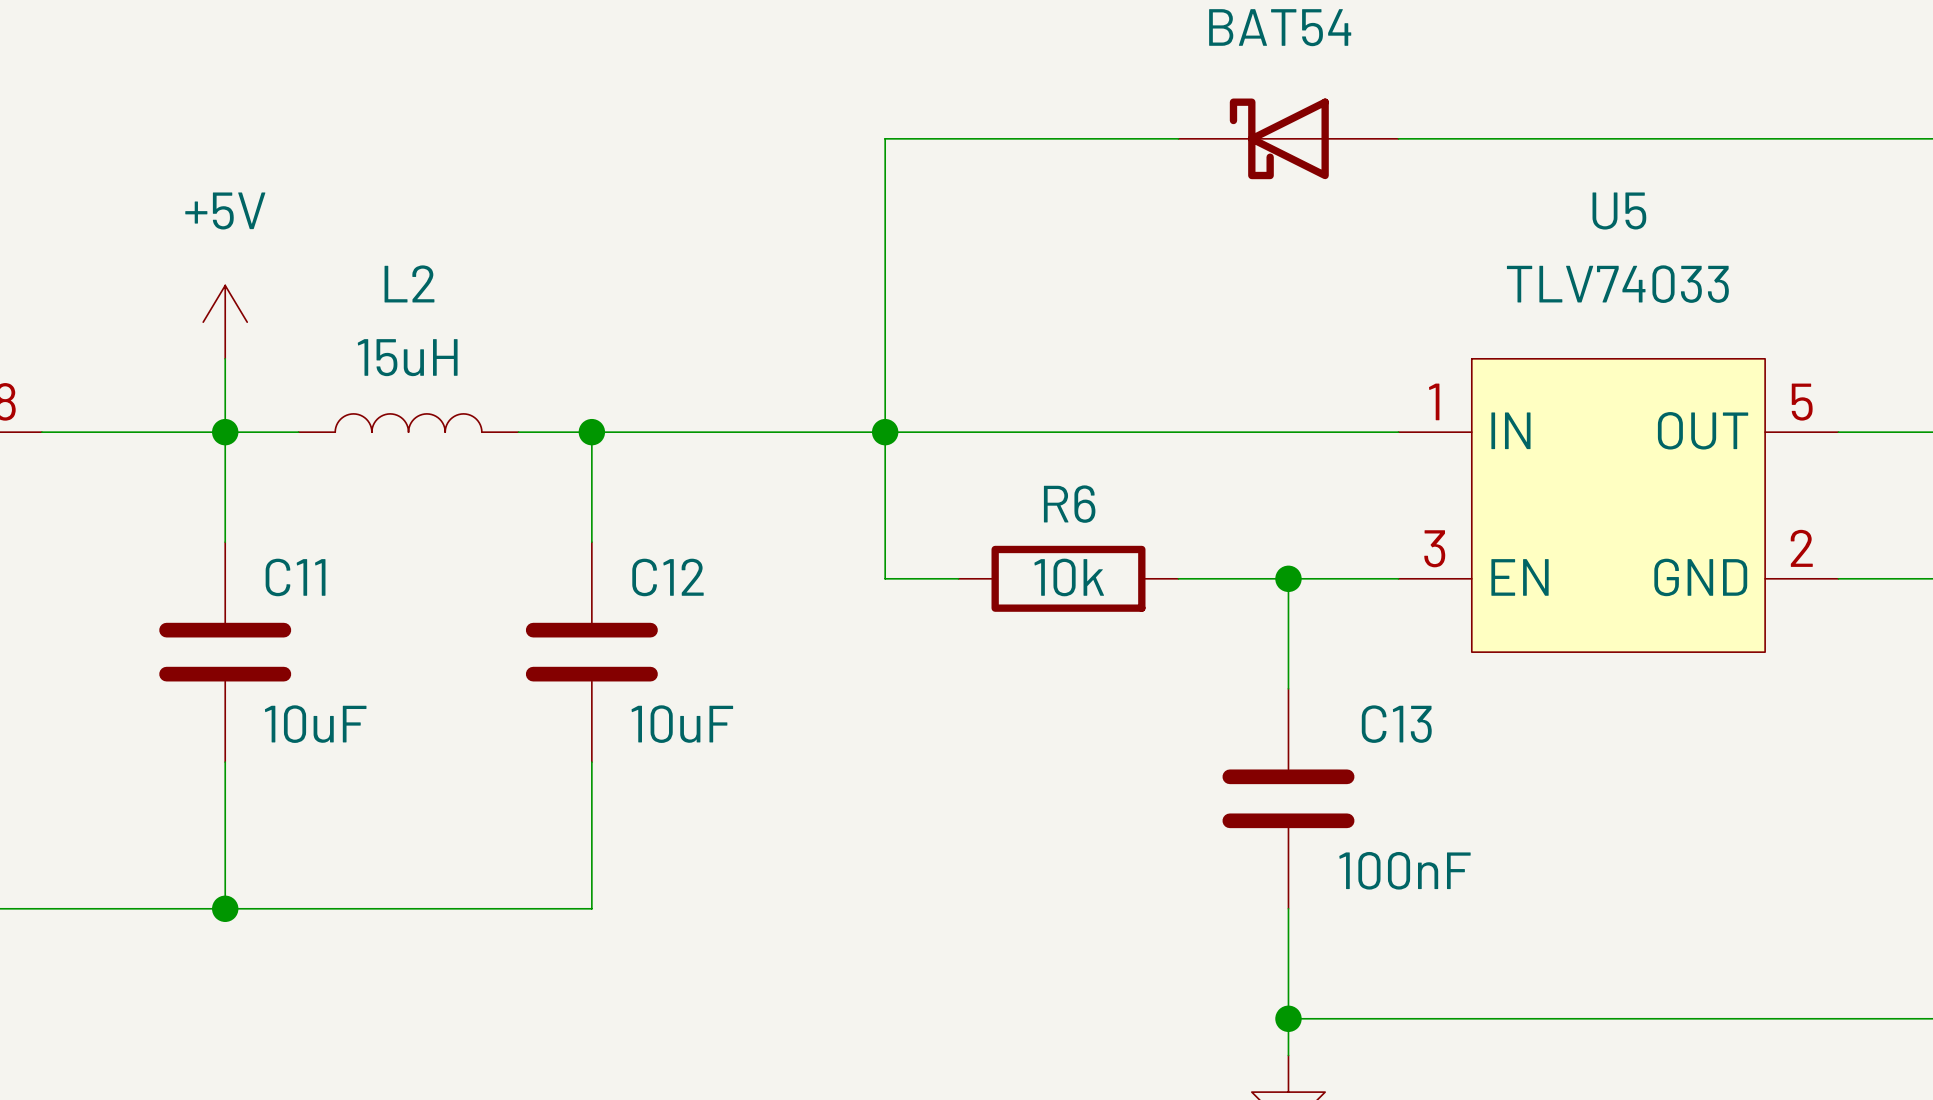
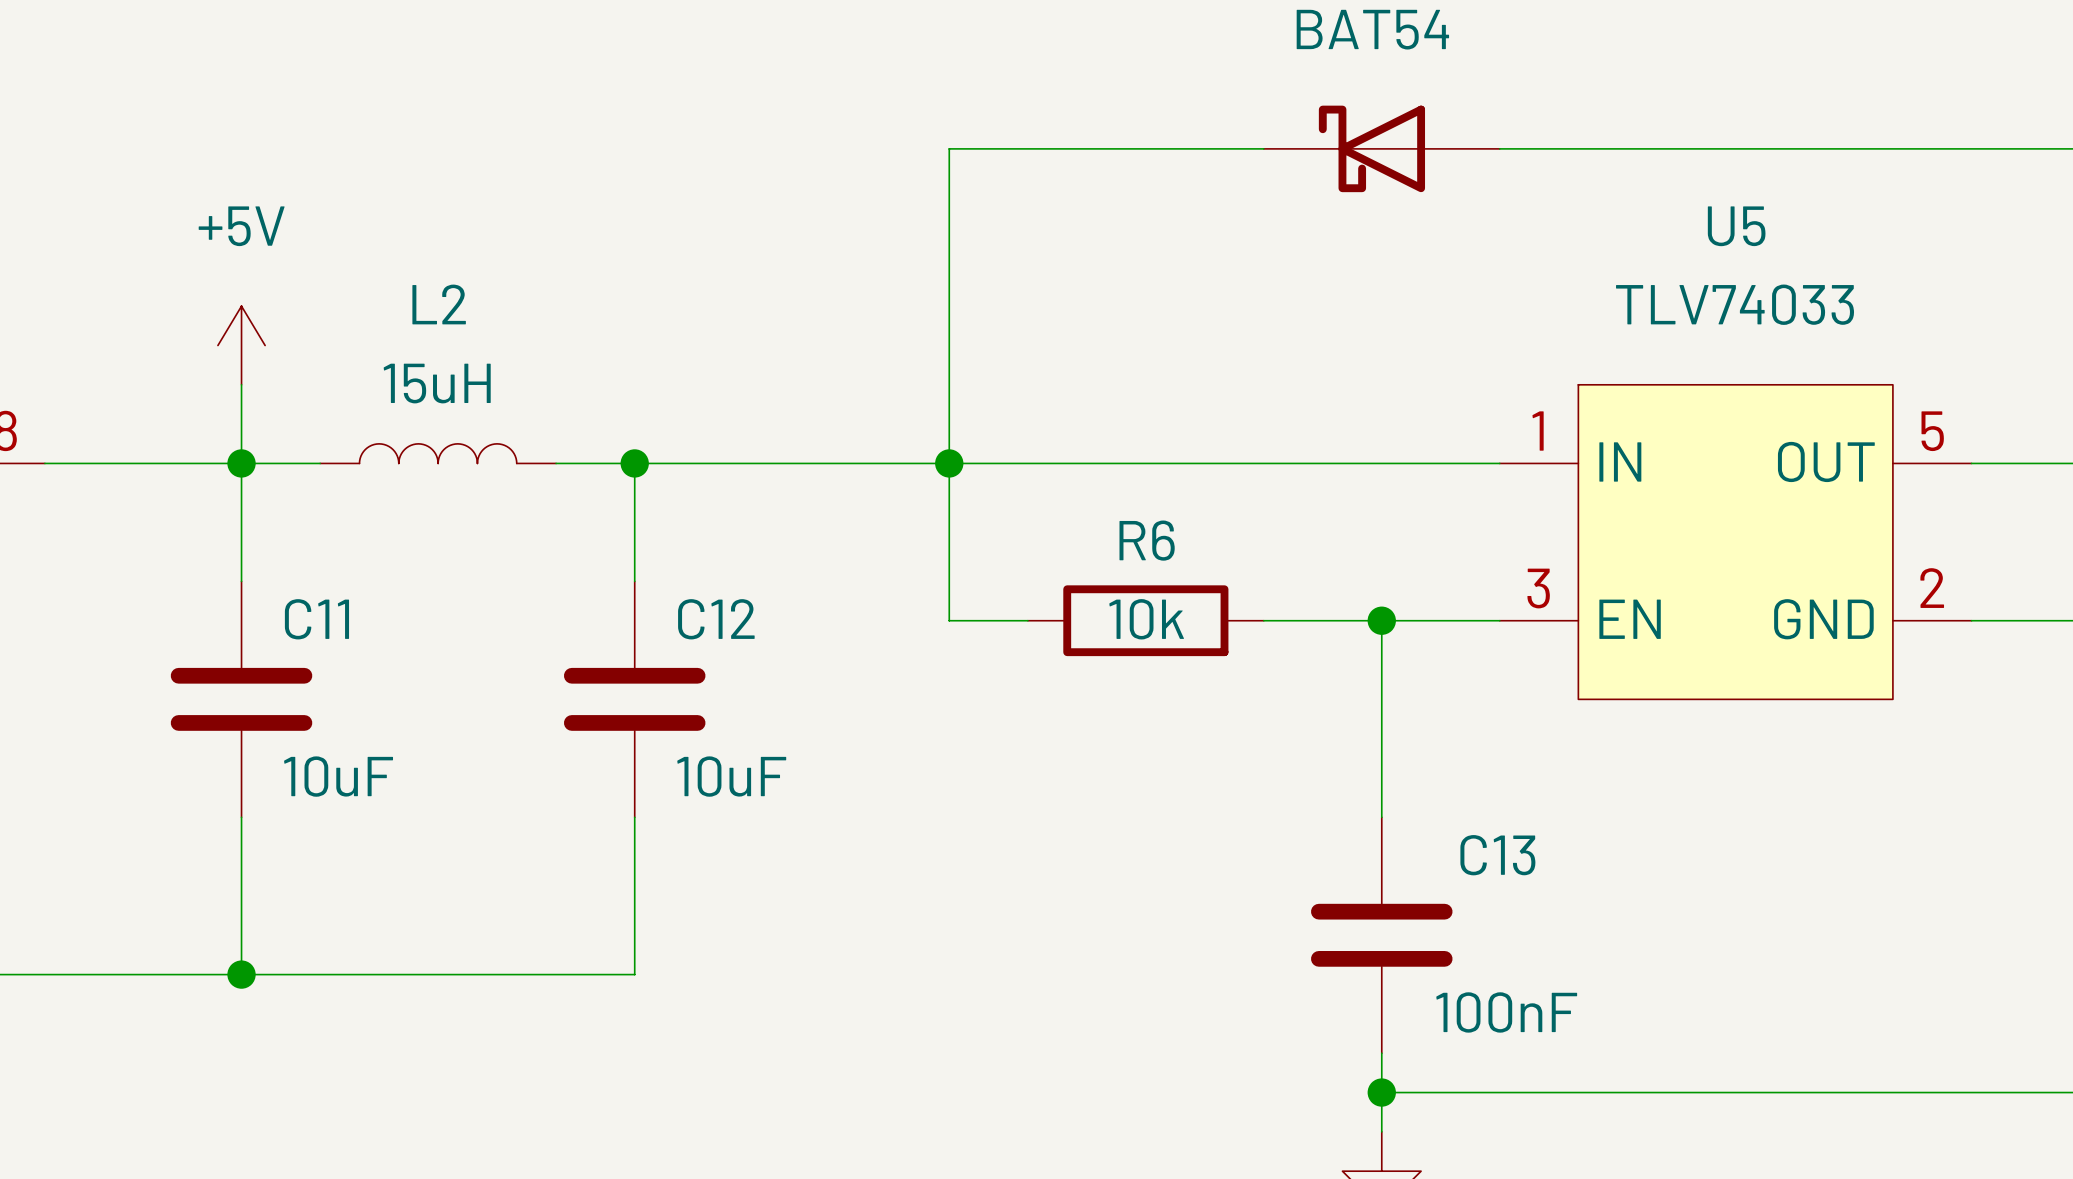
C13 position: (1288, 798) -> (1381, 935)

